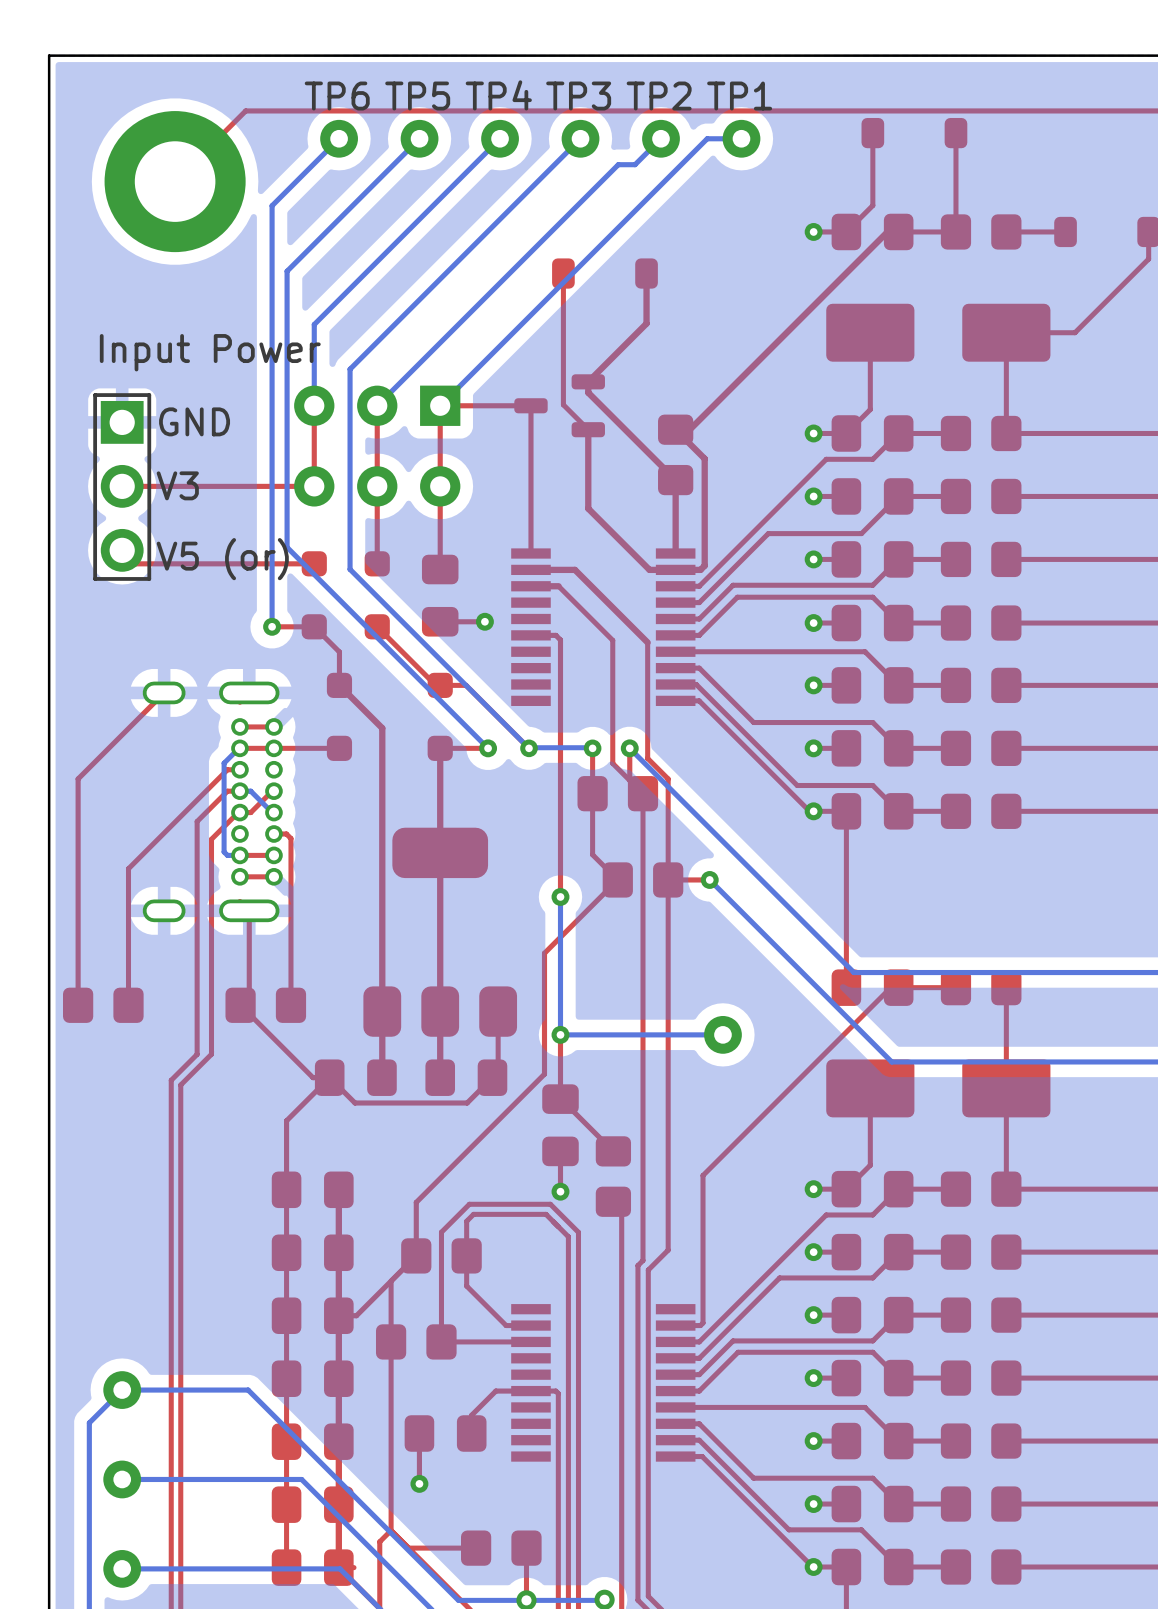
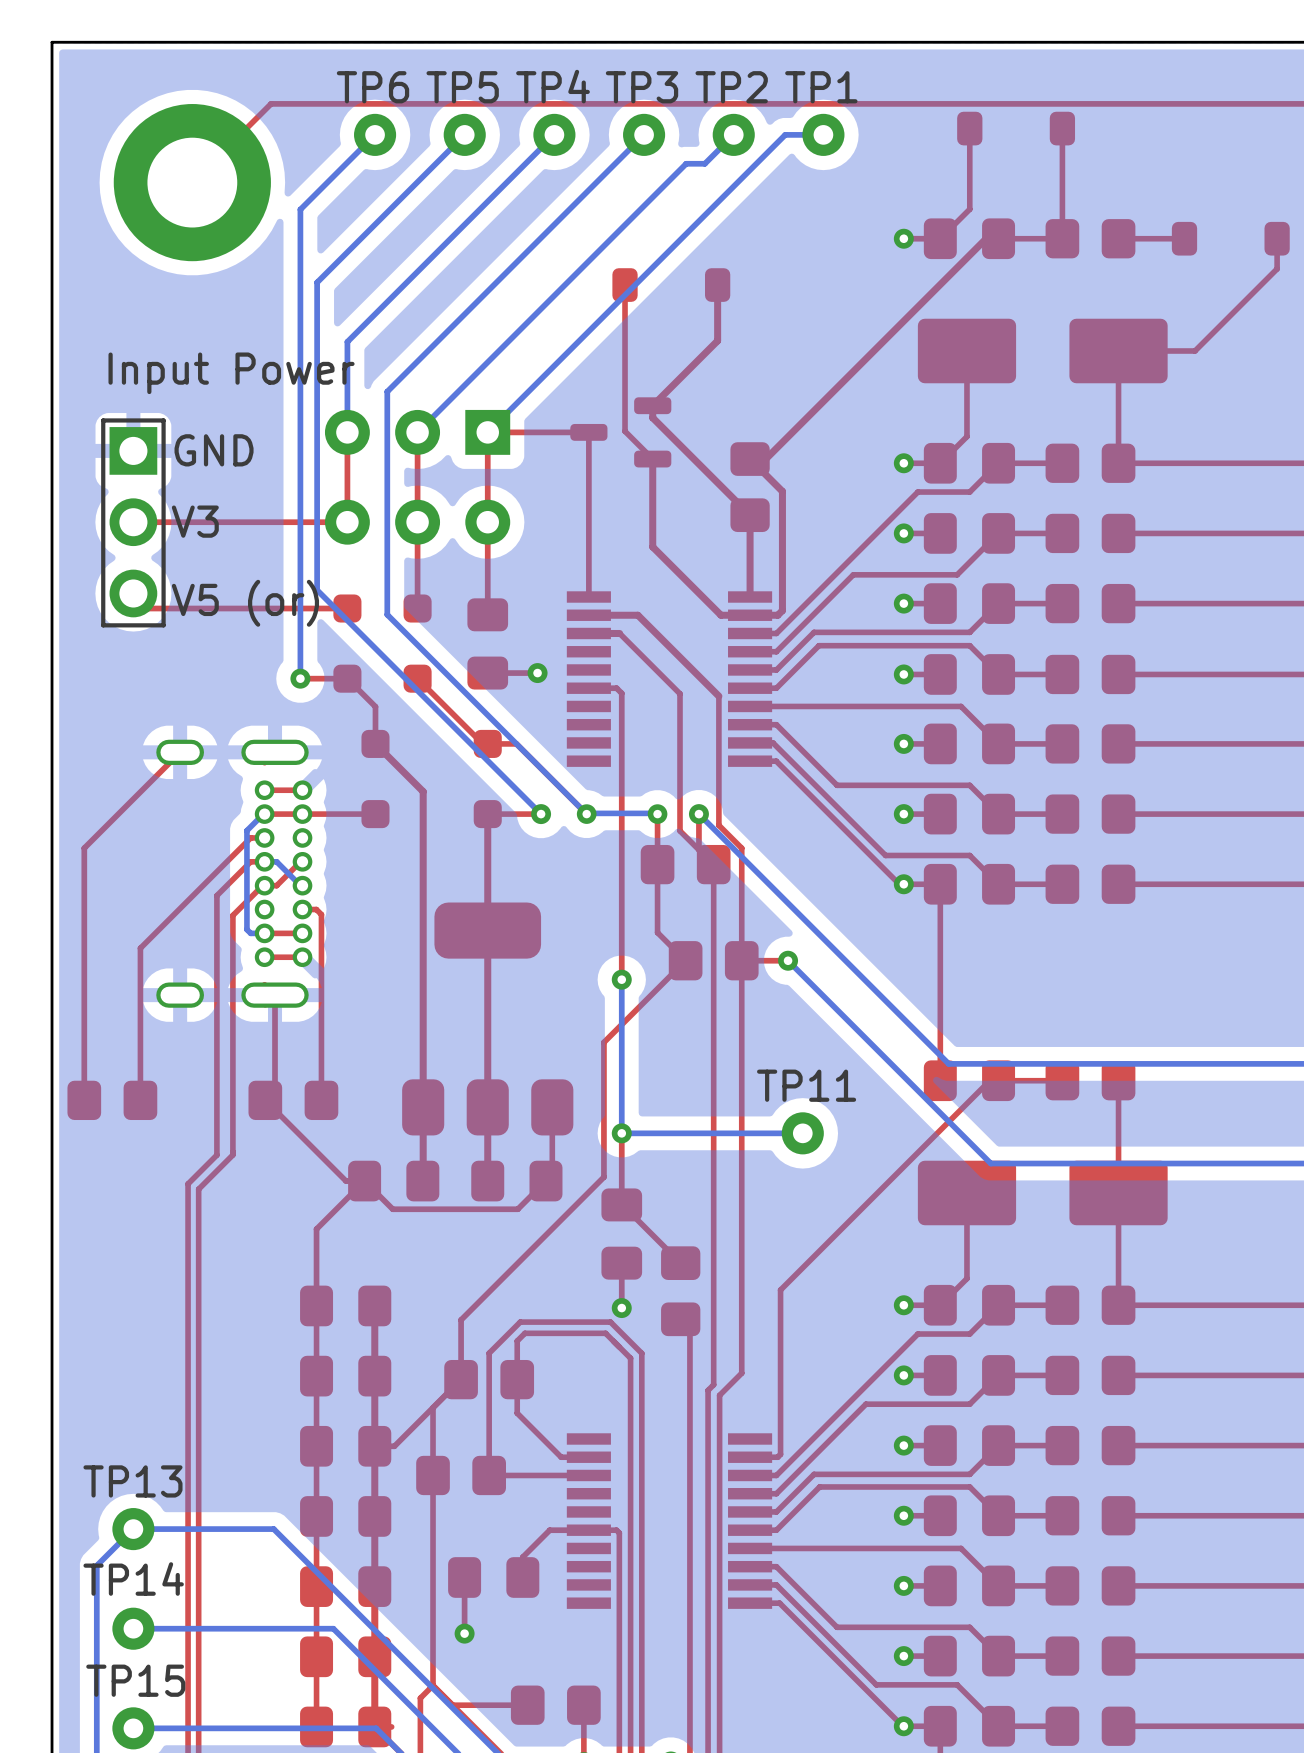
text: none -> TP11 (806, 1085)
text: none -> TP13 (132, 1481)
text: none -> TP14 (133, 1579)
text: none -> TP15 (135, 1680)

